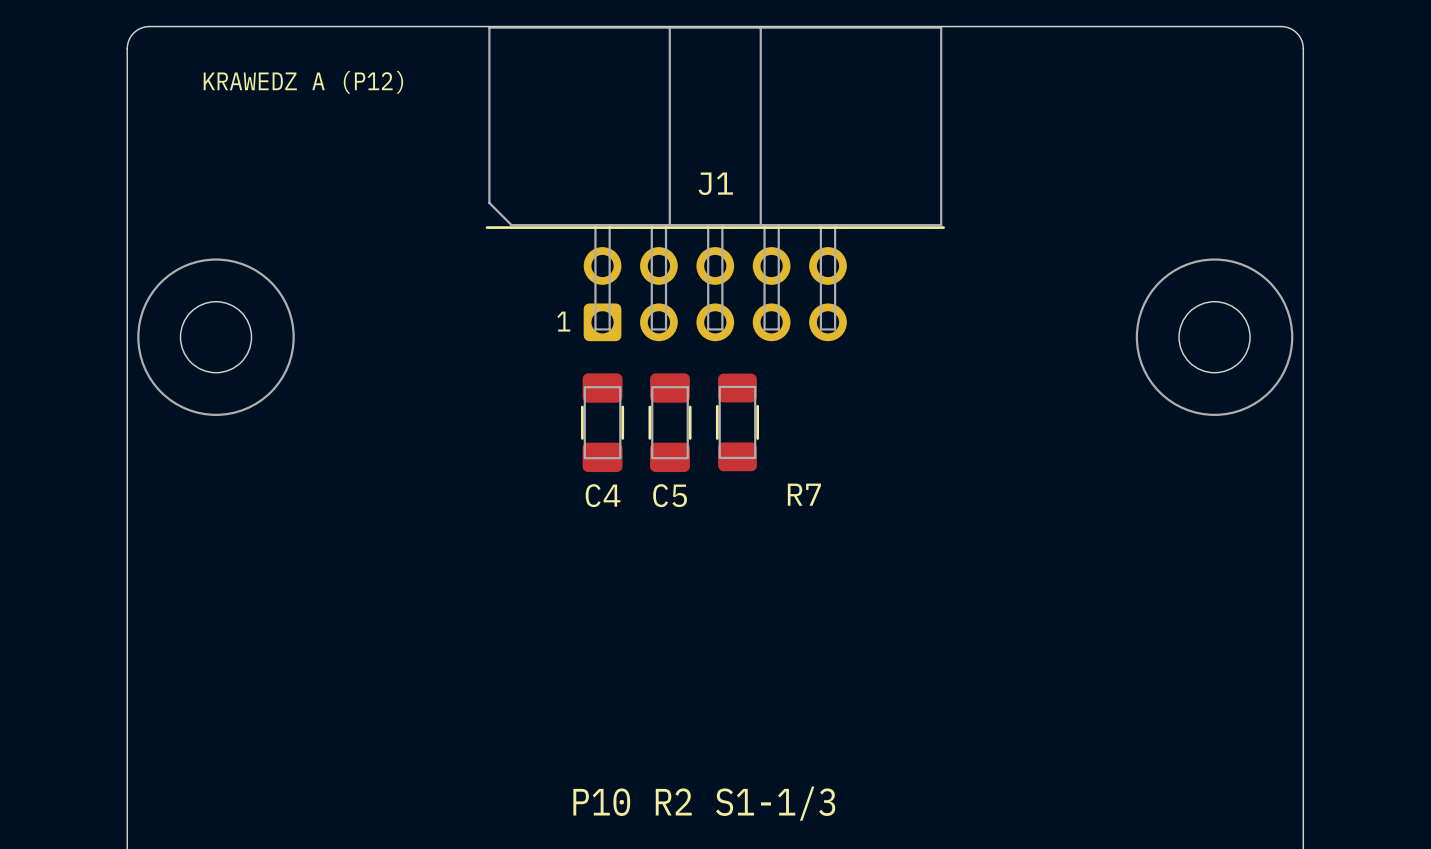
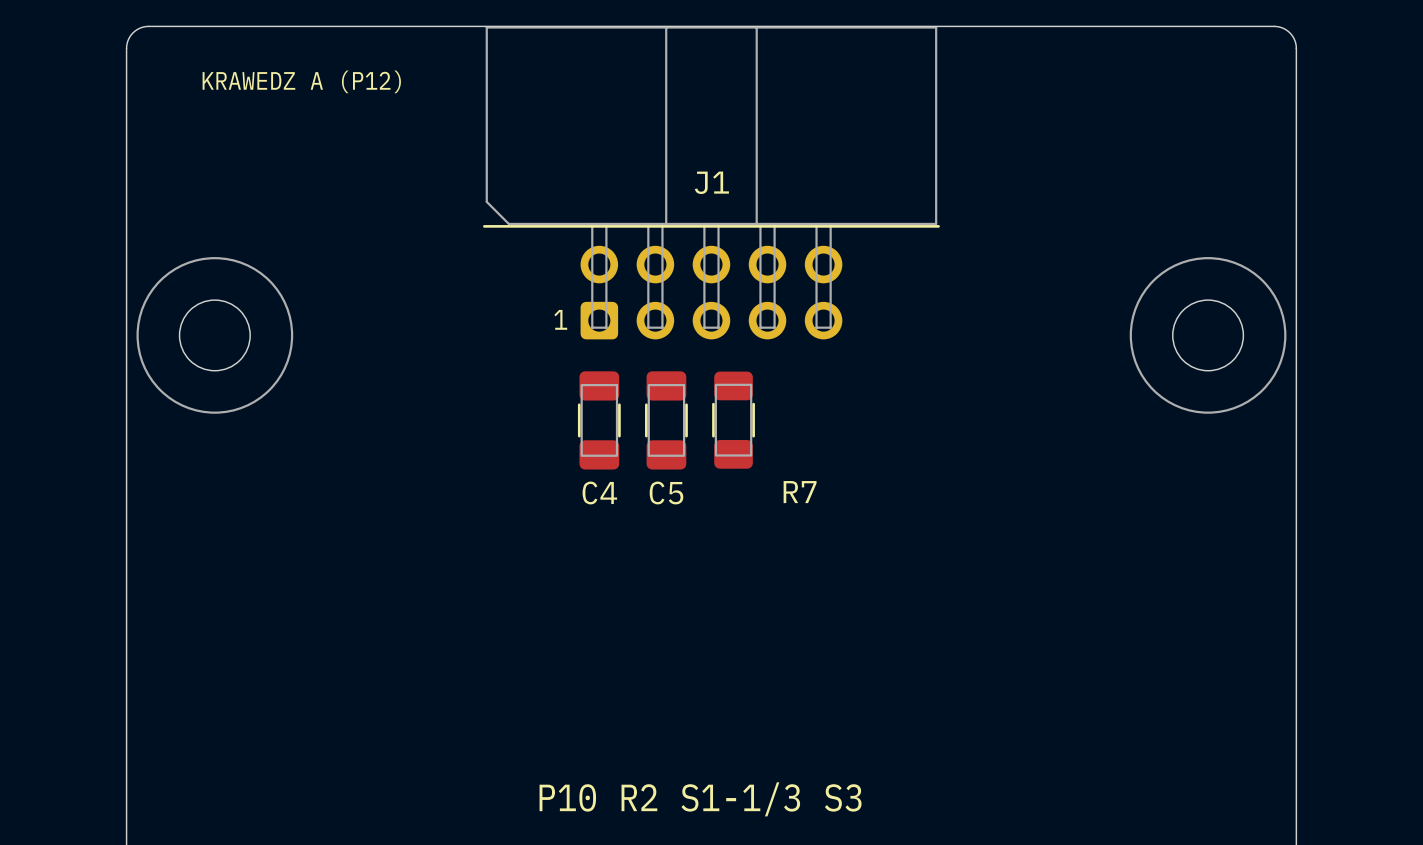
text: P10 R2 S1-1/3 (704, 803) -> P10 R2 S1-1/3 S3 (700, 799)

